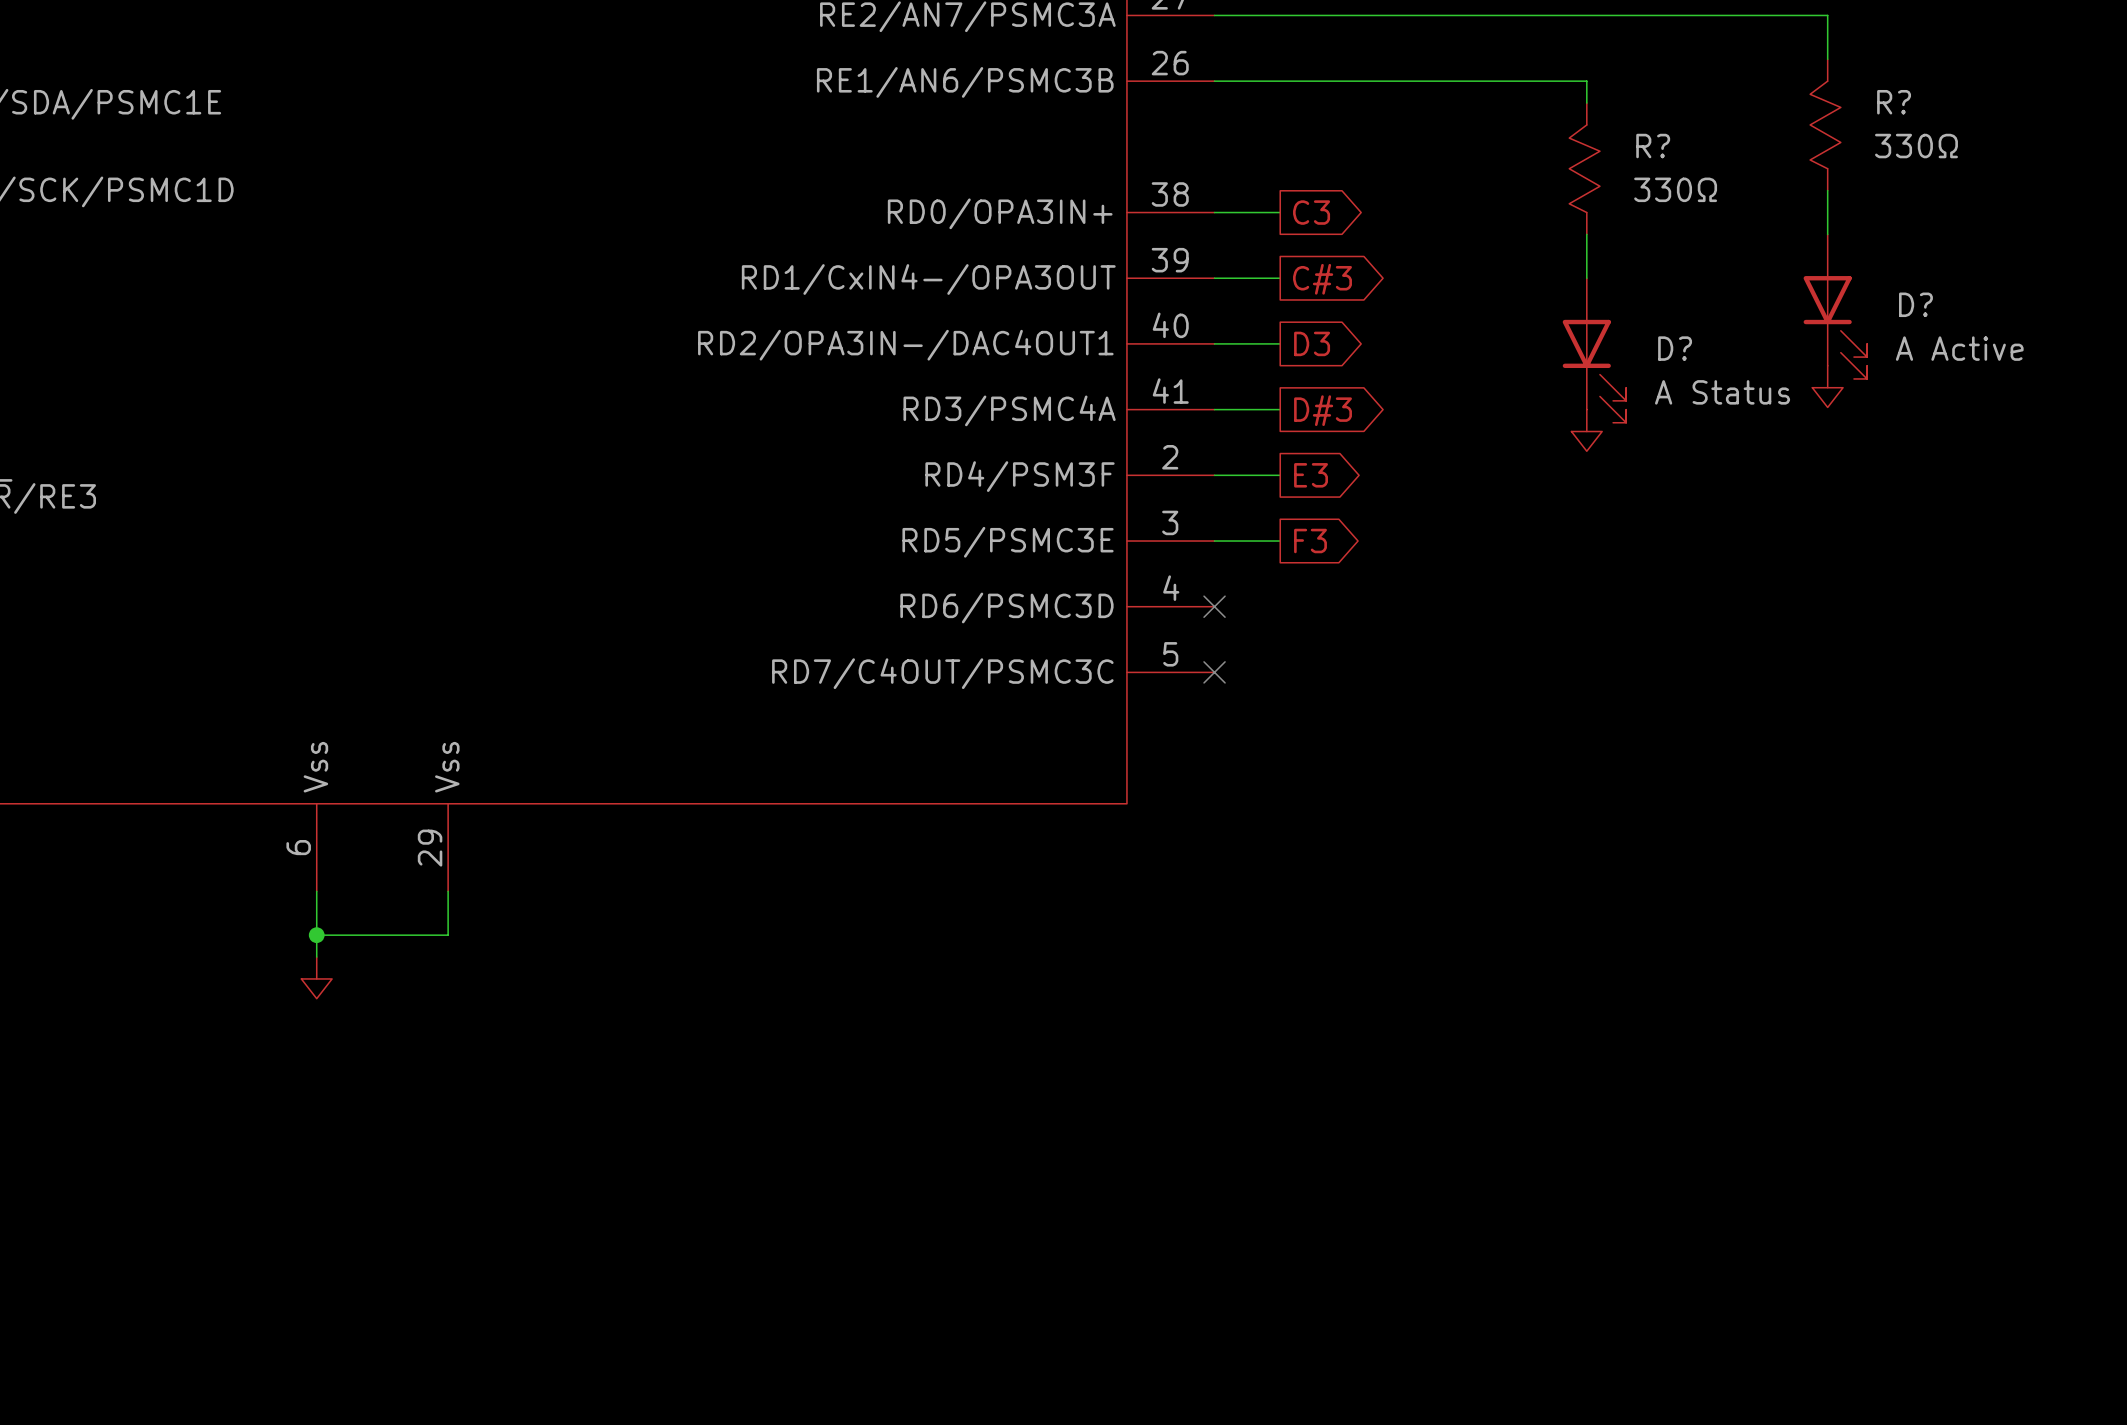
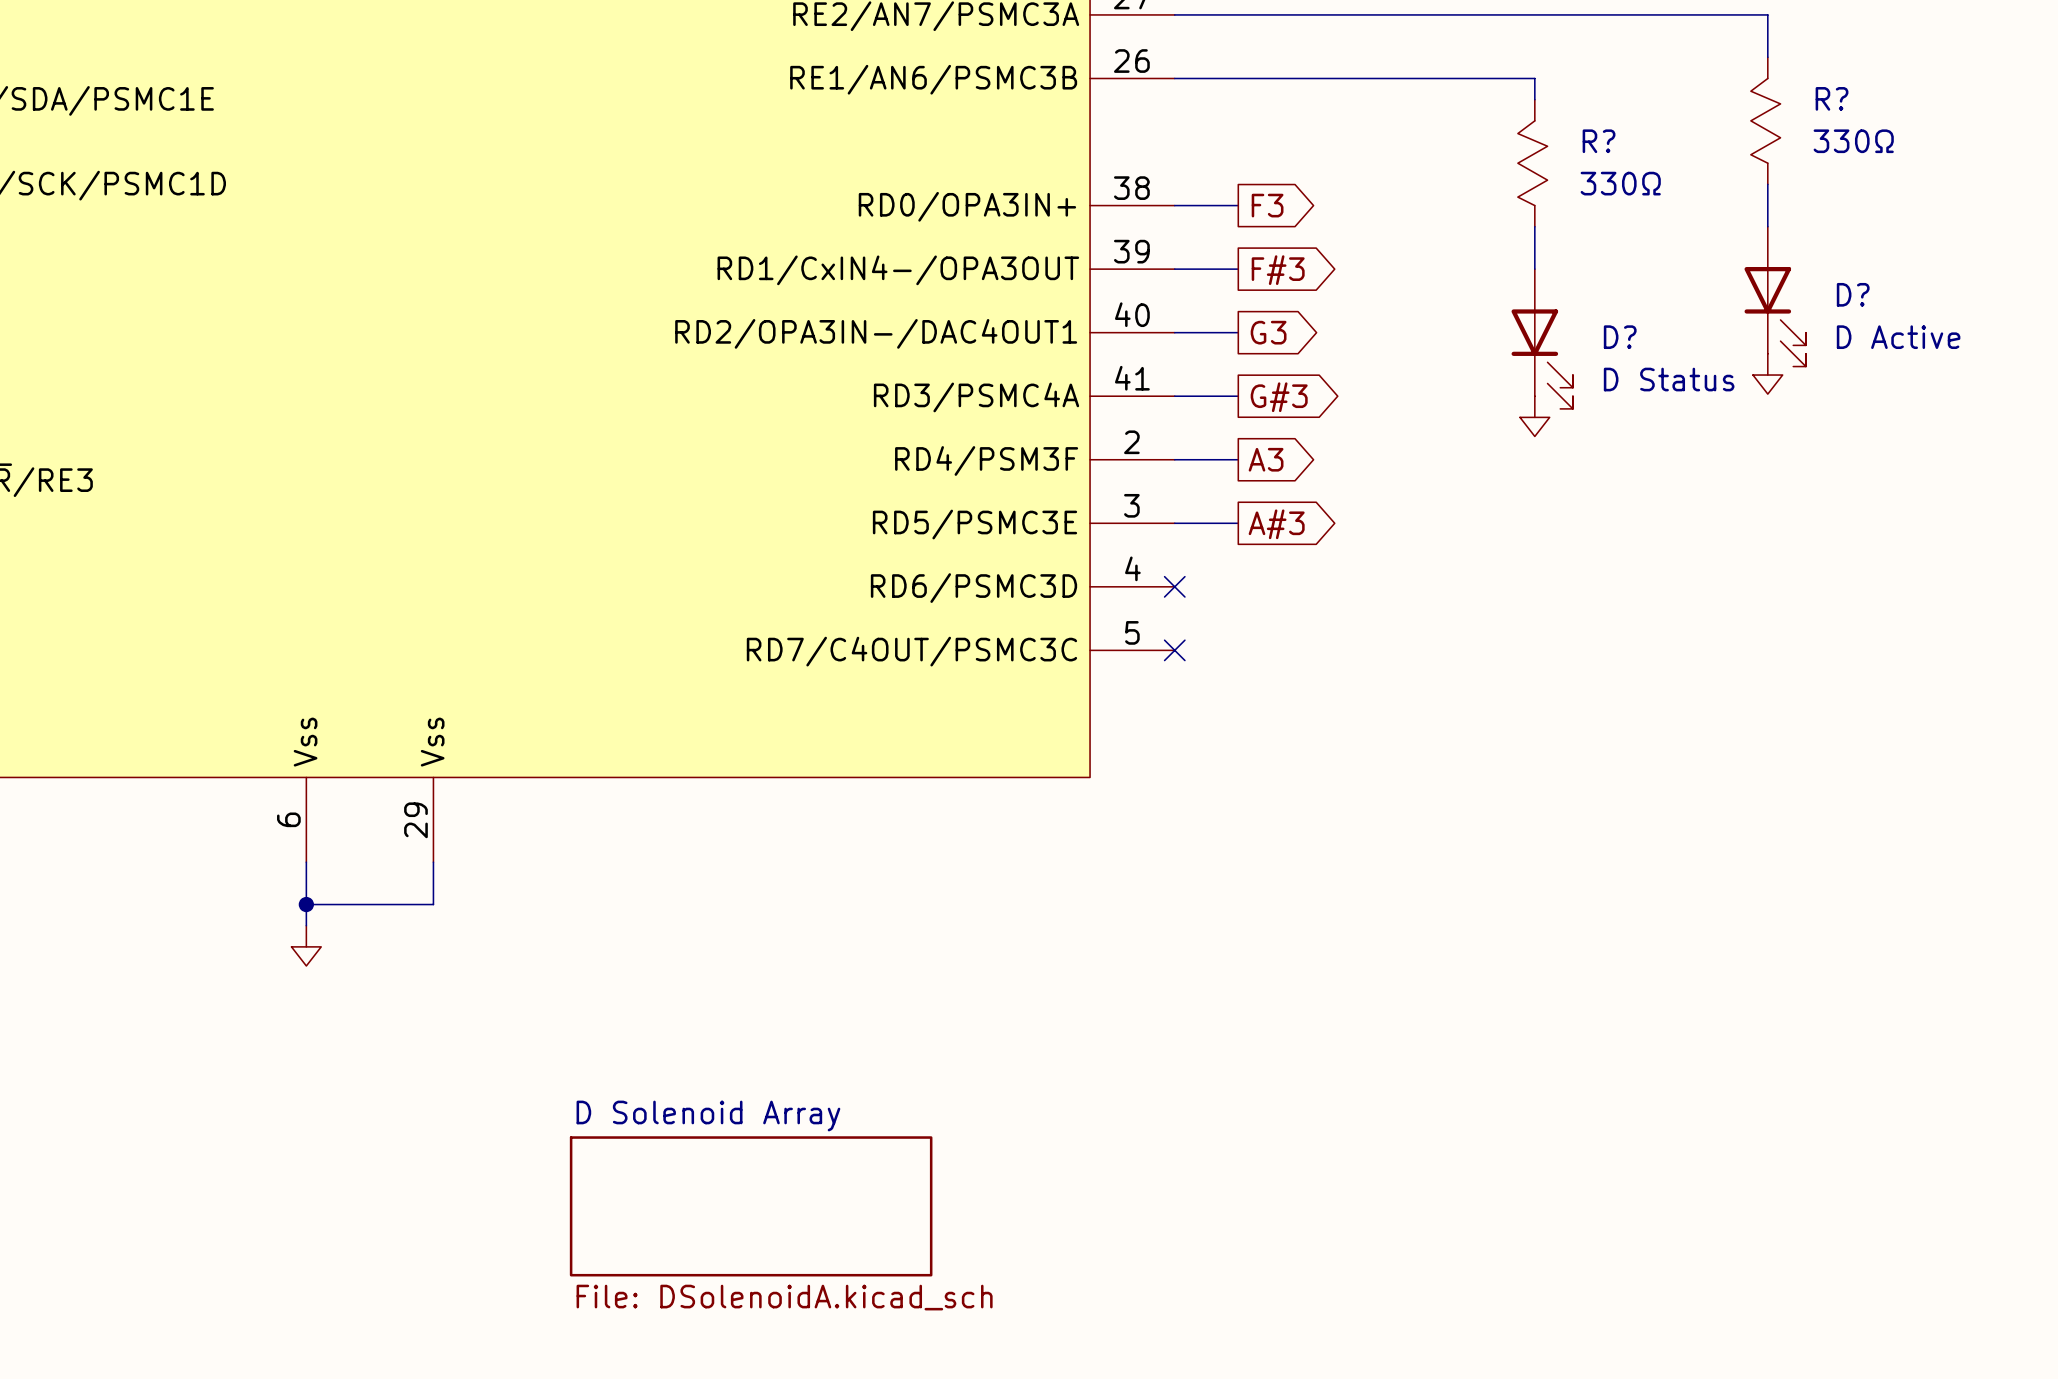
global label: C3 (1311, 212) -> F3 (1267, 205)
global label: C#3 (1322, 279) -> F#3 (1278, 270)
global label: D3 (1312, 343) -> G3 (1268, 332)
D? value: A Active (1959, 348) -> D Active (1898, 337)
D? value: A Status (1722, 392) -> D Status (1669, 379)
global label: D#3 (1323, 410) -> G#3 (1279, 397)
global label: E3 (1311, 475) -> A3 (1266, 459)
global label: F3 (1310, 541) -> A#3 (1276, 524)
sheet D Solenoid Array: none -> File: DSolenoidA.kicad_sch (751, 1206)

